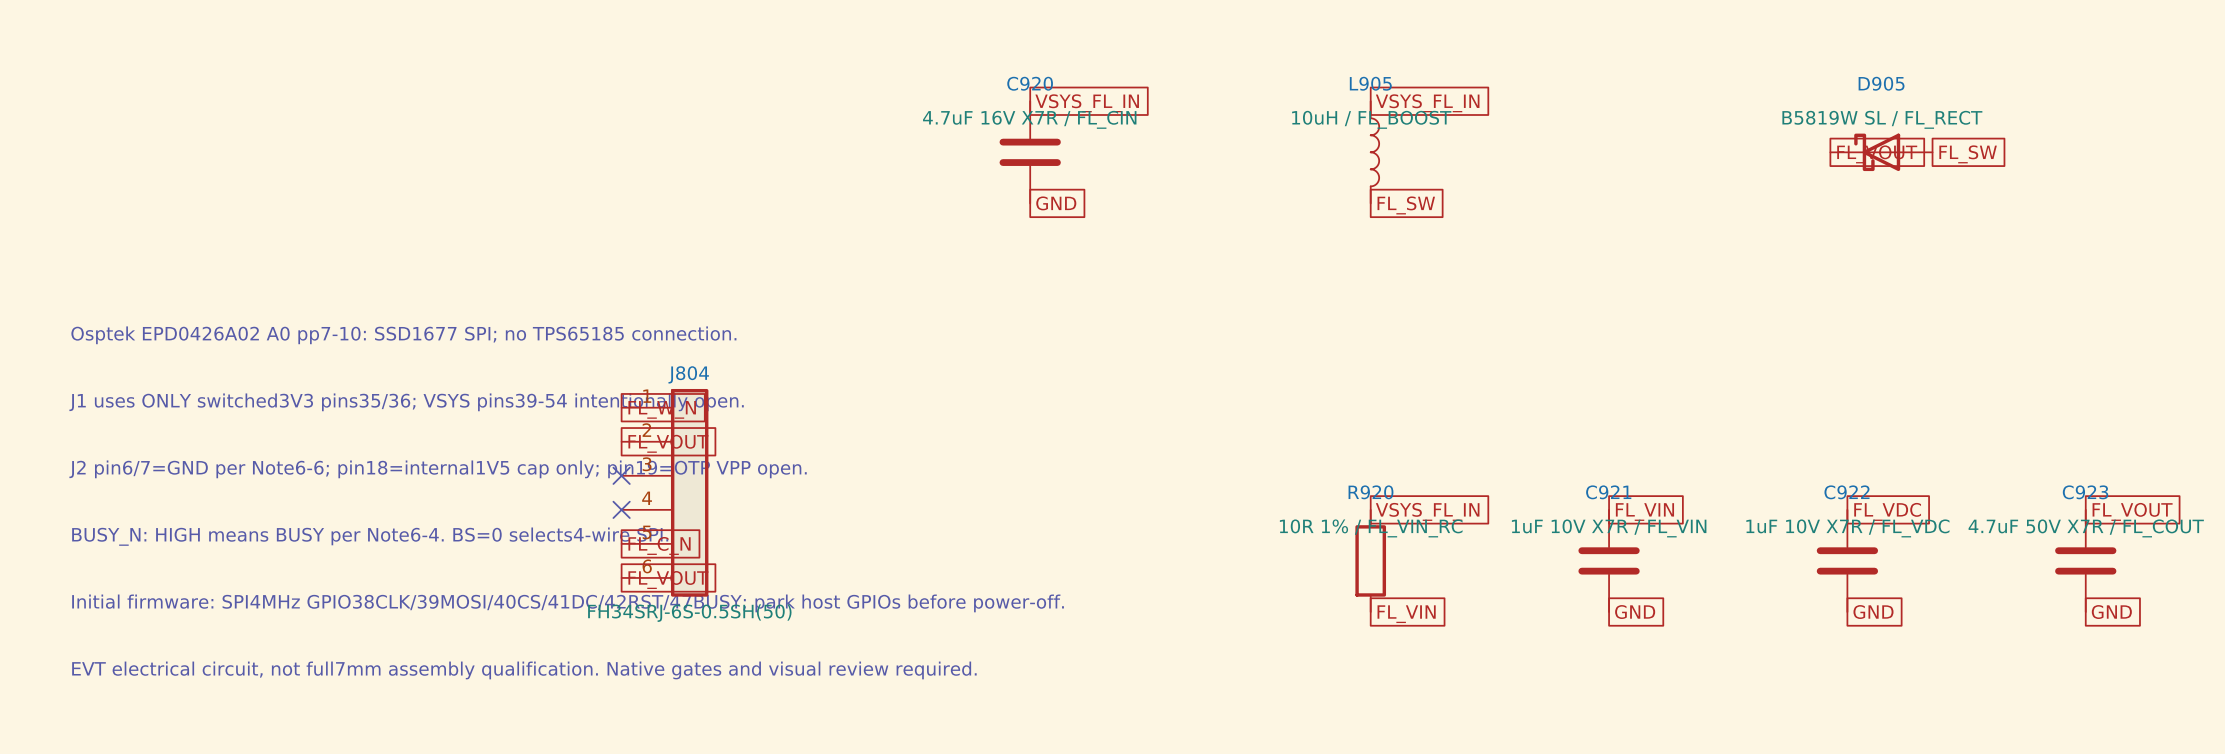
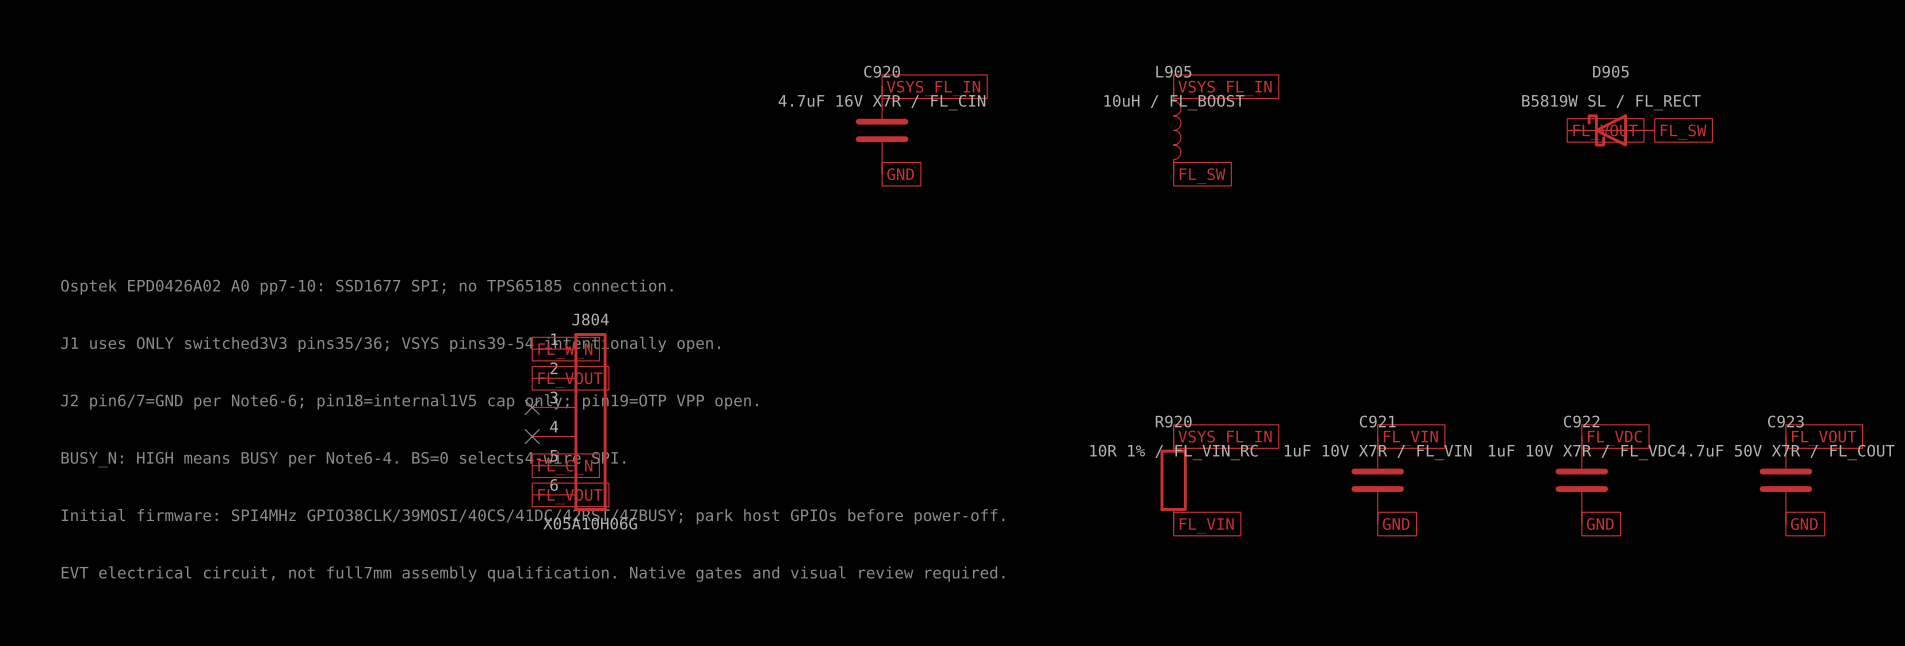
J804 value: FH34SRJ-6S-0.5SH(50) (689, 613) -> X05A10H06G (590, 523)

